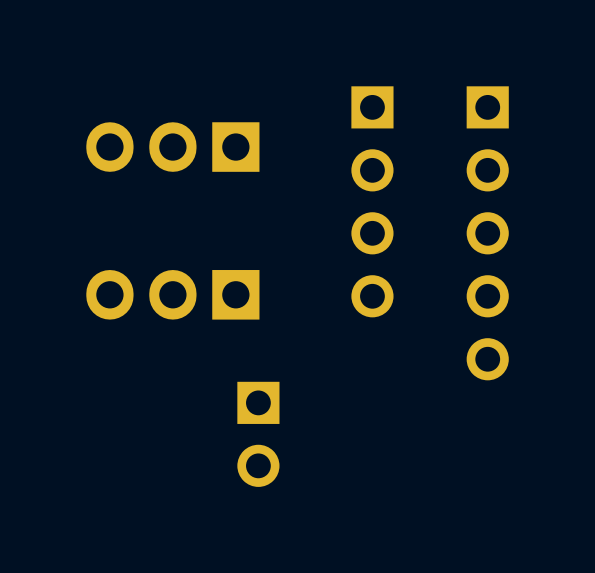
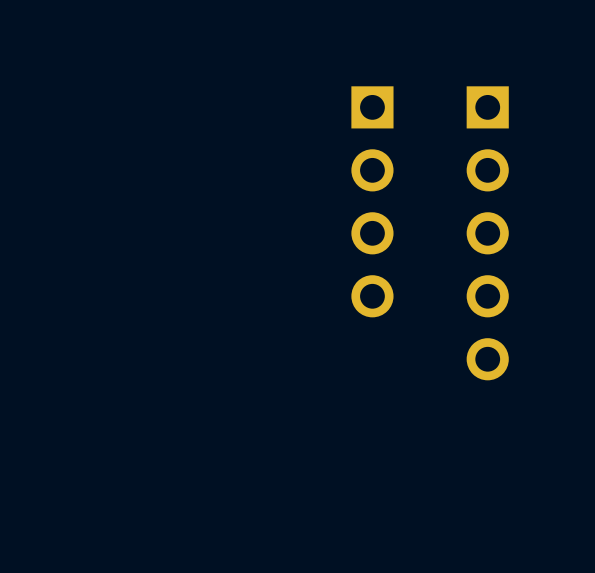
part: (172, 147) -> none
part: (172, 294) -> none
part: (258, 434) -> none

